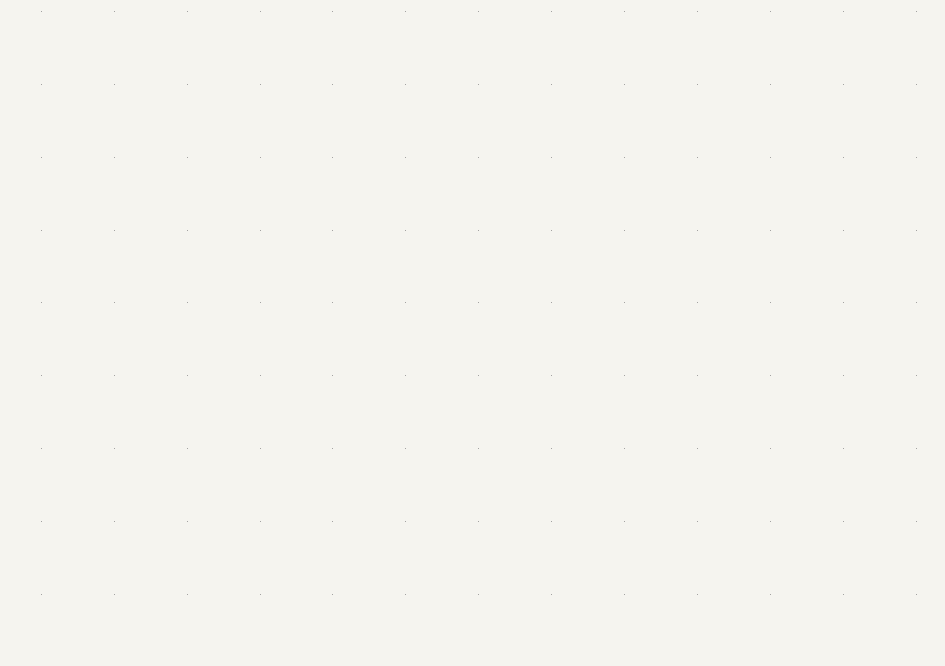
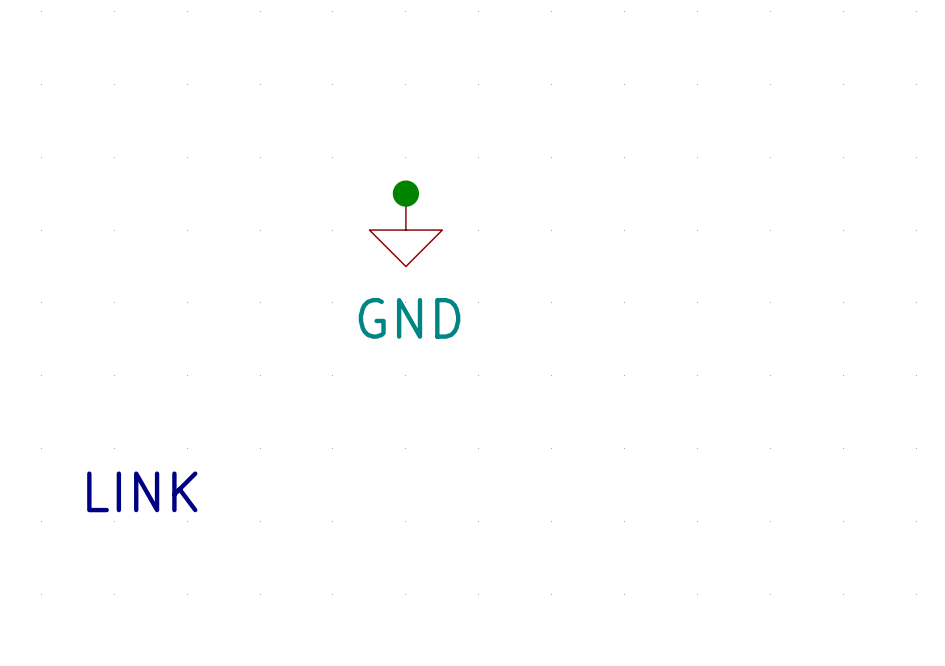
junction: none -> (405, 193)
power symbol: none -> GND (405, 230)
text: none -> LINK (142, 491)

